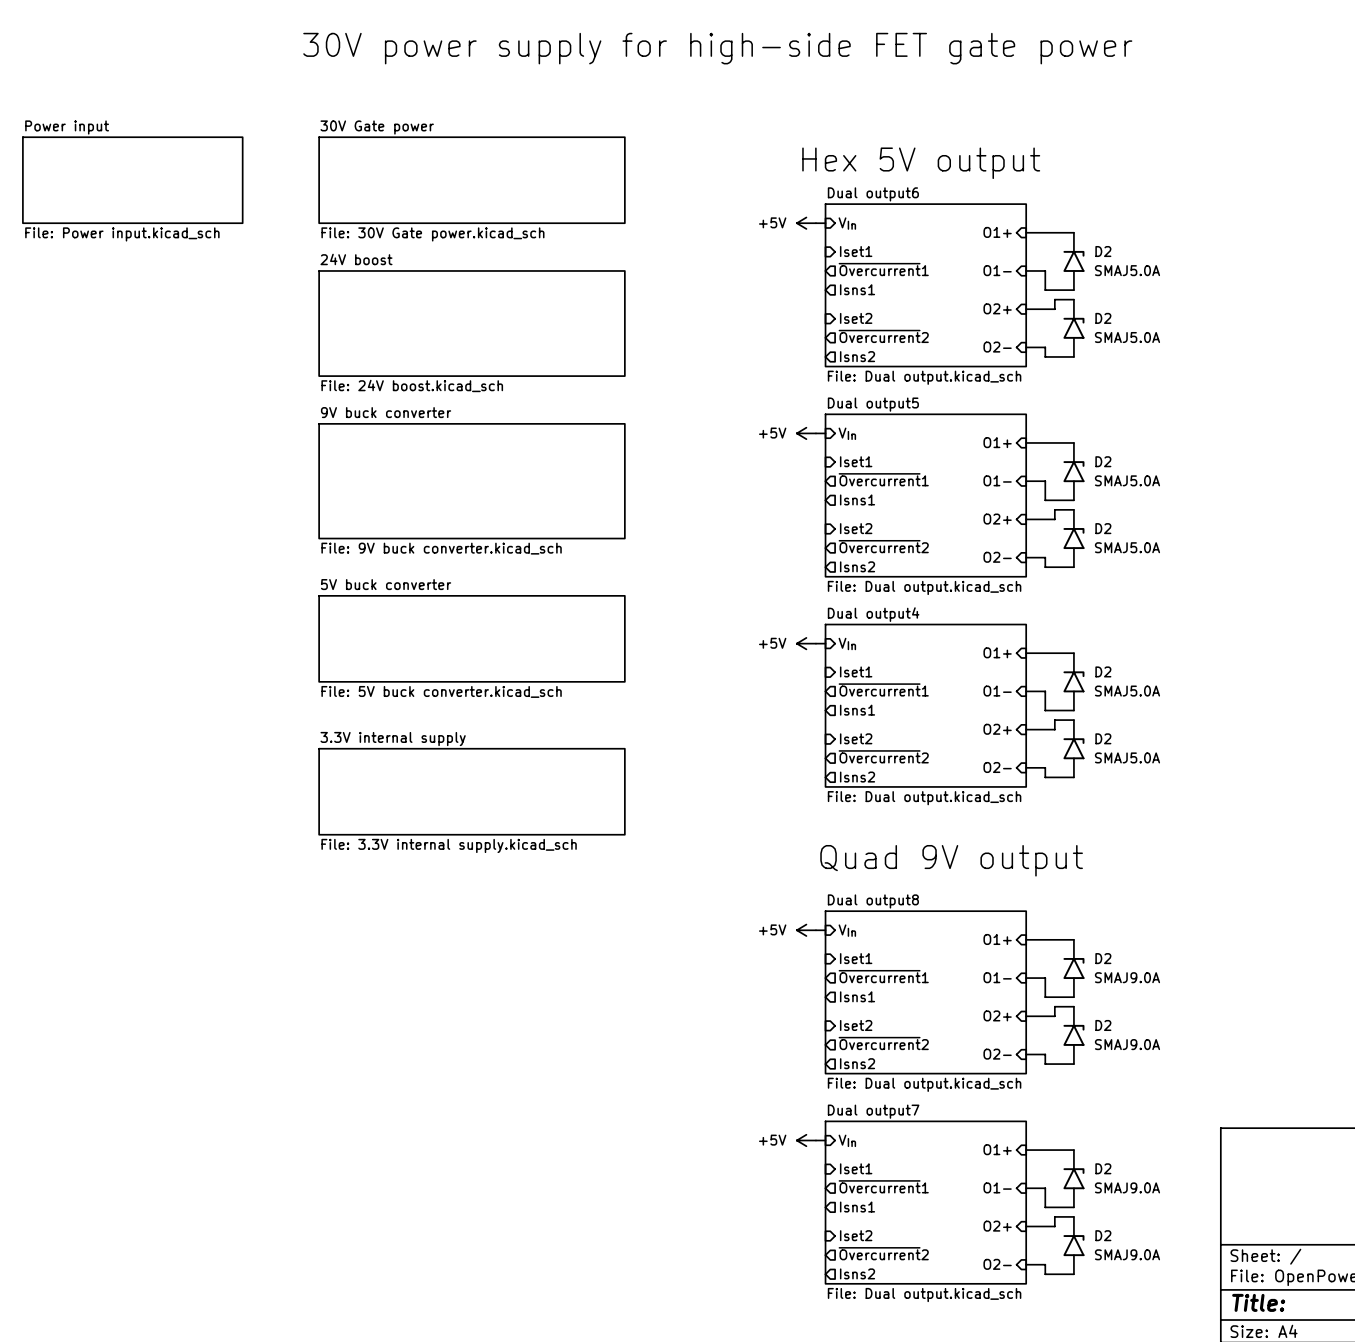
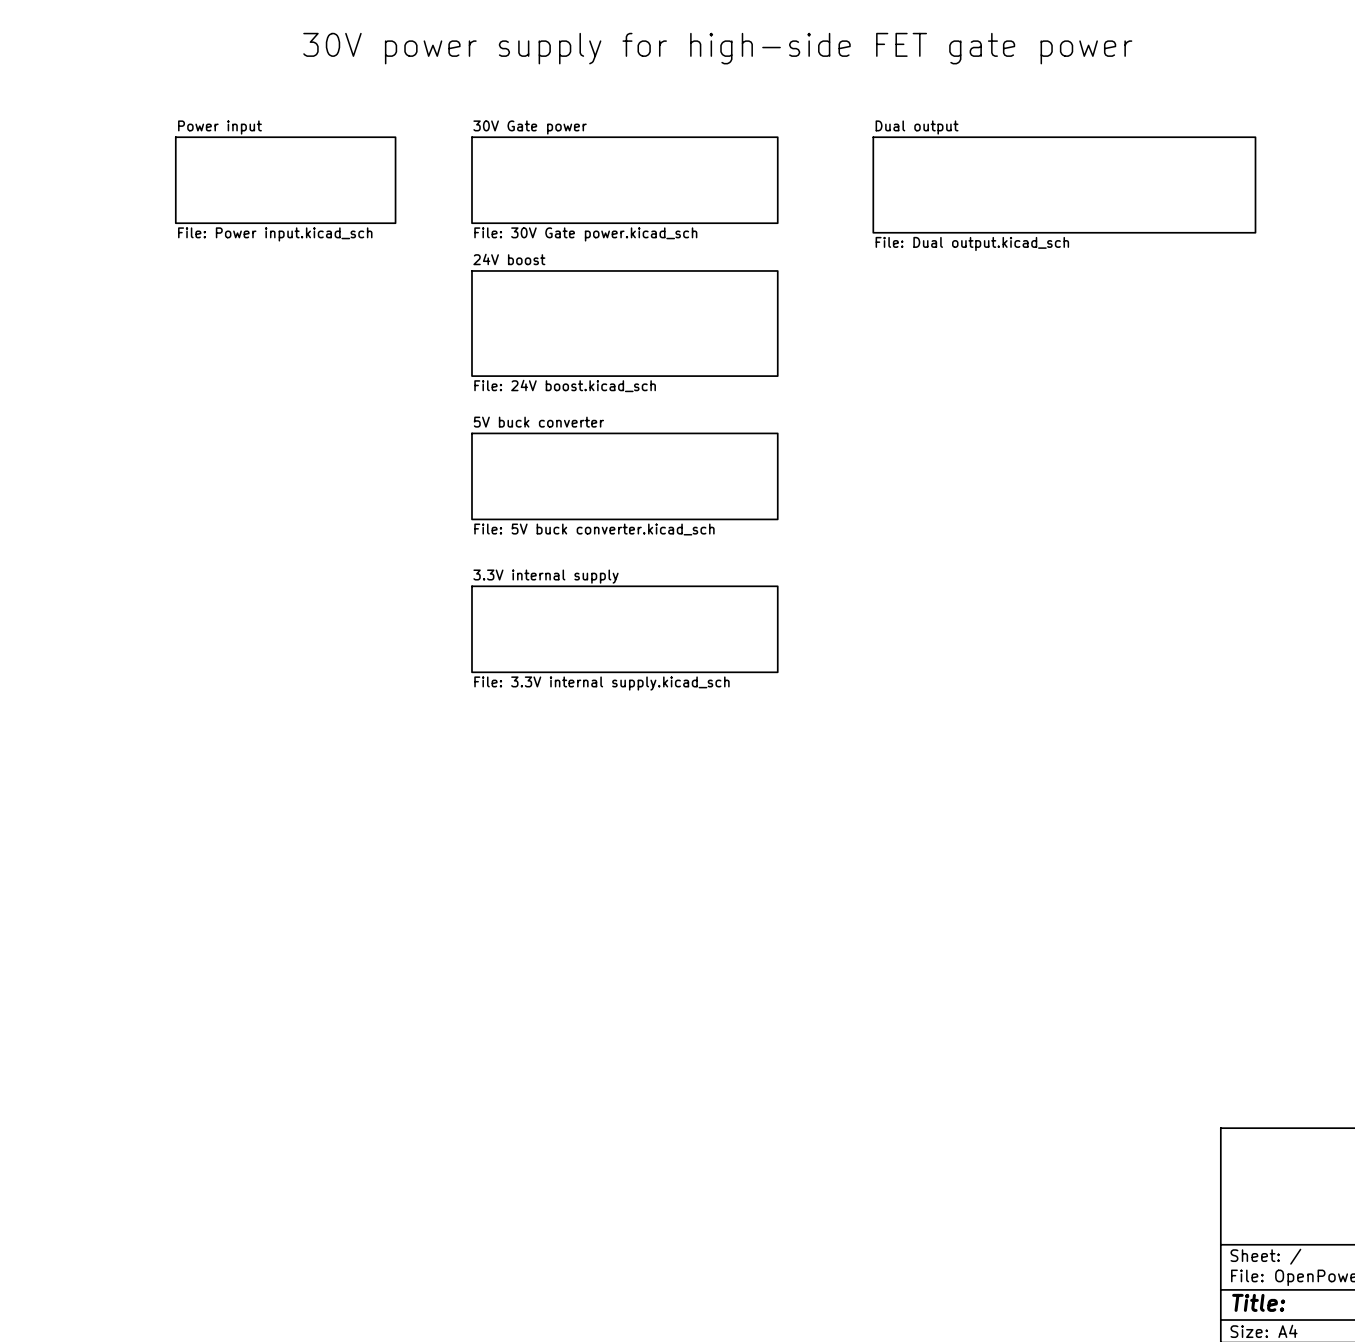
text: Hex 5V output (921, 163) -> none
sheet Power input position: (132, 180) -> (285, 180)
sheet 30V Gate power position: (471, 180) -> (624, 180)
sheet Dual output: none -> File: Dual output.kicad_sch (1064, 184)
power symbol: +5V (806, 223) -> none
wire: (815, 223) (825, 223) -> none
sheet pin: VIn (847, 223) -> none
sheet pin: O1+ (997, 232) -> none
sheet pin: Iset1 (856, 251) -> none
D2: SMAJ5.0A (1073, 261) -> none
sheet pin: ~{Overcurrent}1 (883, 269) -> none
sheet pin: O1- (997, 270) -> none
wire: (1026, 270) (1045, 270) (1045, 290) (1073, 290) -> none
sheet Dual output6: File: Dual output.kicad_sch (925, 285) -> none
sheet pin: Isns1 (857, 289) -> none
wire: (1073, 299) (1054, 299) (1054, 309) (1026, 309) -> none
sheet pin: O2+ (997, 308) -> none
sheet pin: Iset2 (856, 318) -> none
sheet 24V boost position: (471, 323) -> (624, 323)
D2: SMAJ5.0A (1073, 328) -> none
sheet pin: ~{Overcurrent}2 (883, 336) -> none
sheet pin: O2- (997, 347) -> none
wire: (1026, 347) (1045, 347) (1045, 356) (1073, 356) -> none
sheet pin: Isns2 (857, 356) -> none
power symbol: +5V (806, 433) -> none
wire: (815, 433) (825, 433) -> none
sheet pin: VIn (847, 433) -> none
sheet pin: O1+ (997, 442) -> none
wire: (1026, 442) (1073, 442) -> none
sheet pin: Iset1 (856, 461) -> none
D2: SMAJ5.0A (1073, 471) -> none
sheet pin: ~{Overcurrent}1 (883, 479) -> none
sheet pin: O1- (997, 480) -> none
sheet 9V buck converter: File: 9V buck converter.kicad_sch (471, 481) -> none
wire: (1026, 481) (1045, 481) (1045, 500) (1073, 500) -> none
sheet Dual output5: File: Dual output.kicad_sch (925, 495) -> none
sheet pin: Isns1 (857, 499) -> none
wire: (1073, 509) (1054, 509) (1054, 519) (1026, 519) -> none
sheet pin: O2+ (997, 519) -> none
sheet pin: Iset2 (856, 528) -> none
D2: SMAJ5.0A (1073, 538) -> none
sheet pin: ~{Overcurrent}2 (883, 546) -> none
sheet pin: O2- (997, 557) -> none
wire: (1026, 557) (1045, 557) (1045, 567) (1073, 567) -> none
sheet pin: Isns2 (857, 566) -> none
sheet 5V buck converter position: (471, 638) -> (624, 476)
power symbol: +5V (806, 643) -> none
wire: (815, 643) (825, 643) -> none
sheet pin: VIn (847, 643) -> none
sheet pin: O1+ (997, 652) -> none
wire: (1026, 653) (1073, 653) -> none
sheet pin: Iset1 (856, 671) -> none
D2: SMAJ5.0A (1073, 681) -> none
sheet pin: ~{Overcurrent}1 (883, 689) -> none
sheet pin: O1- (997, 691) -> none
wire: (1026, 691) (1045, 691) (1045, 710) (1073, 710) -> none
sheet Dual output4: File: Dual output.kicad_sch (925, 705) -> none
sheet pin: Isns1 (857, 710) -> none
wire: (1073, 720) (1054, 720) (1054, 729) (1026, 729) -> none
sheet pin: O2+ (997, 729) -> none
sheet pin: Iset2 (856, 738) -> none
D2: SMAJ5.0A (1073, 748) -> none
sheet pin: ~{Overcurrent}2 (883, 756) -> none
sheet pin: O2- (997, 767) -> none
wire: (1026, 767) (1045, 767) (1045, 777) (1073, 777) -> none
sheet pin: Isns2 (857, 777) -> none
sheet 3.3V internal supply position: (471, 791) -> (624, 629)
text: Quad 9V output (951, 860) -> none
power symbol: +5V (806, 930) -> none
wire: (815, 930) (825, 930) -> none
sheet pin: VIn (847, 930) -> none
sheet pin: O1+ (997, 939) -> none
wire: (1026, 939) (1073, 939) -> none
sheet pin: Iset1 (856, 958) -> none
D2: SMAJ9.0A (1073, 968) -> none
sheet pin: ~{Overcurrent}1 (883, 976) -> none
sheet pin: O1- (997, 977) -> none
wire: (1026, 978) (1045, 978) (1045, 997) (1073, 997) -> none
sheet Dual output8: File: Dual output.kicad_sch (925, 992) -> none
sheet pin: Isns1 (857, 996) -> none
wire: (1073, 1006) (1054, 1006) (1054, 1016) (1026, 1016) -> none
sheet pin: O2+ (997, 1015) -> none
sheet pin: Iset2 (856, 1025) -> none
D2: SMAJ9.0A (1073, 1035) -> none
sheet pin: ~{Overcurrent}2 (883, 1043) -> none
sheet pin: O2- (997, 1054) -> none
wire: (1026, 1054) (1045, 1054) (1045, 1064) (1073, 1064) -> none
sheet pin: Isns2 (857, 1063) -> none
power symbol: +5V (806, 1140) -> none
wire: (815, 1140) (825, 1140) -> none
sheet pin: VIn (847, 1140) -> none
sheet pin: O1+ (997, 1149) -> none
wire: (1026, 1150) (1073, 1150) -> none
sheet pin: Iset1 (856, 1168) -> none
D2: SMAJ9.0A (1073, 1178) -> none
sheet pin: ~{Overcurrent}1 (883, 1186) -> none
sheet pin: O1- (997, 1187) -> none
wire: (1026, 1188) (1045, 1188) (1045, 1207) (1073, 1207) -> none
sheet Dual output7: File: Dual output.kicad_sch (925, 1202) -> none
sheet pin: Isns1 (857, 1207) -> none
wire: (1073, 1216) (1054, 1216) (1054, 1226) (1026, 1226) -> none
sheet pin: O2+ (997, 1226) -> none
sheet pin: Iset2 (856, 1235) -> none
D2: SMAJ9.0A (1073, 1245) -> none
sheet pin: ~{Overcurrent}2 (883, 1253) -> none
sheet pin: O2- (997, 1264) -> none
wire: (1026, 1264) (1045, 1264) (1045, 1274) (1073, 1274) -> none
sheet pin: Isns2 (857, 1273) -> none

